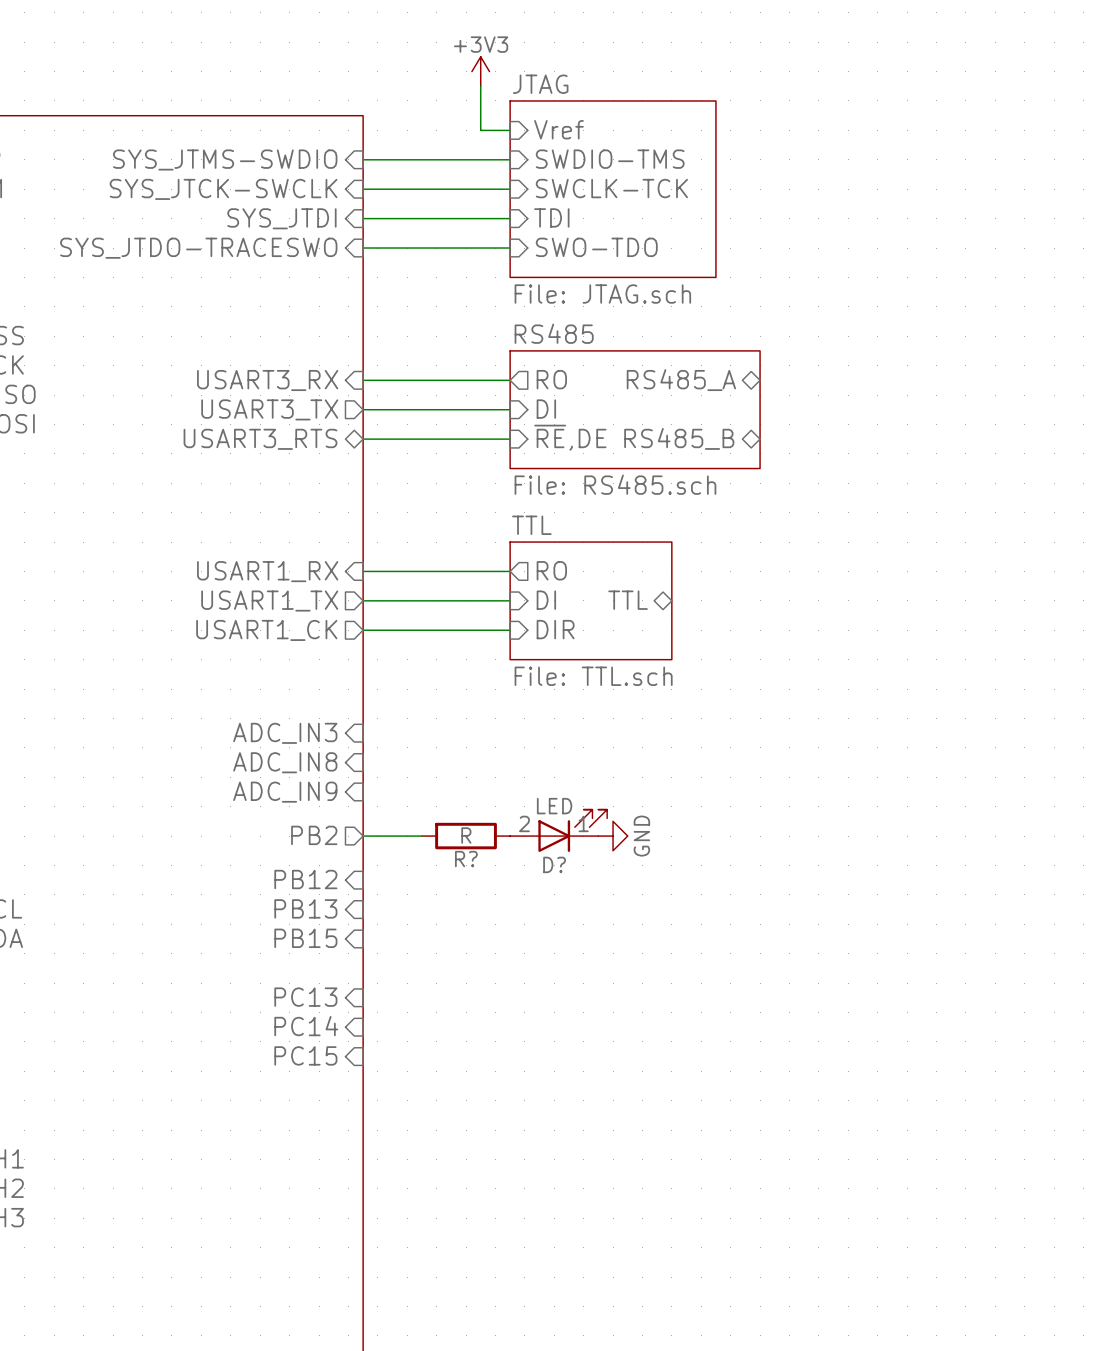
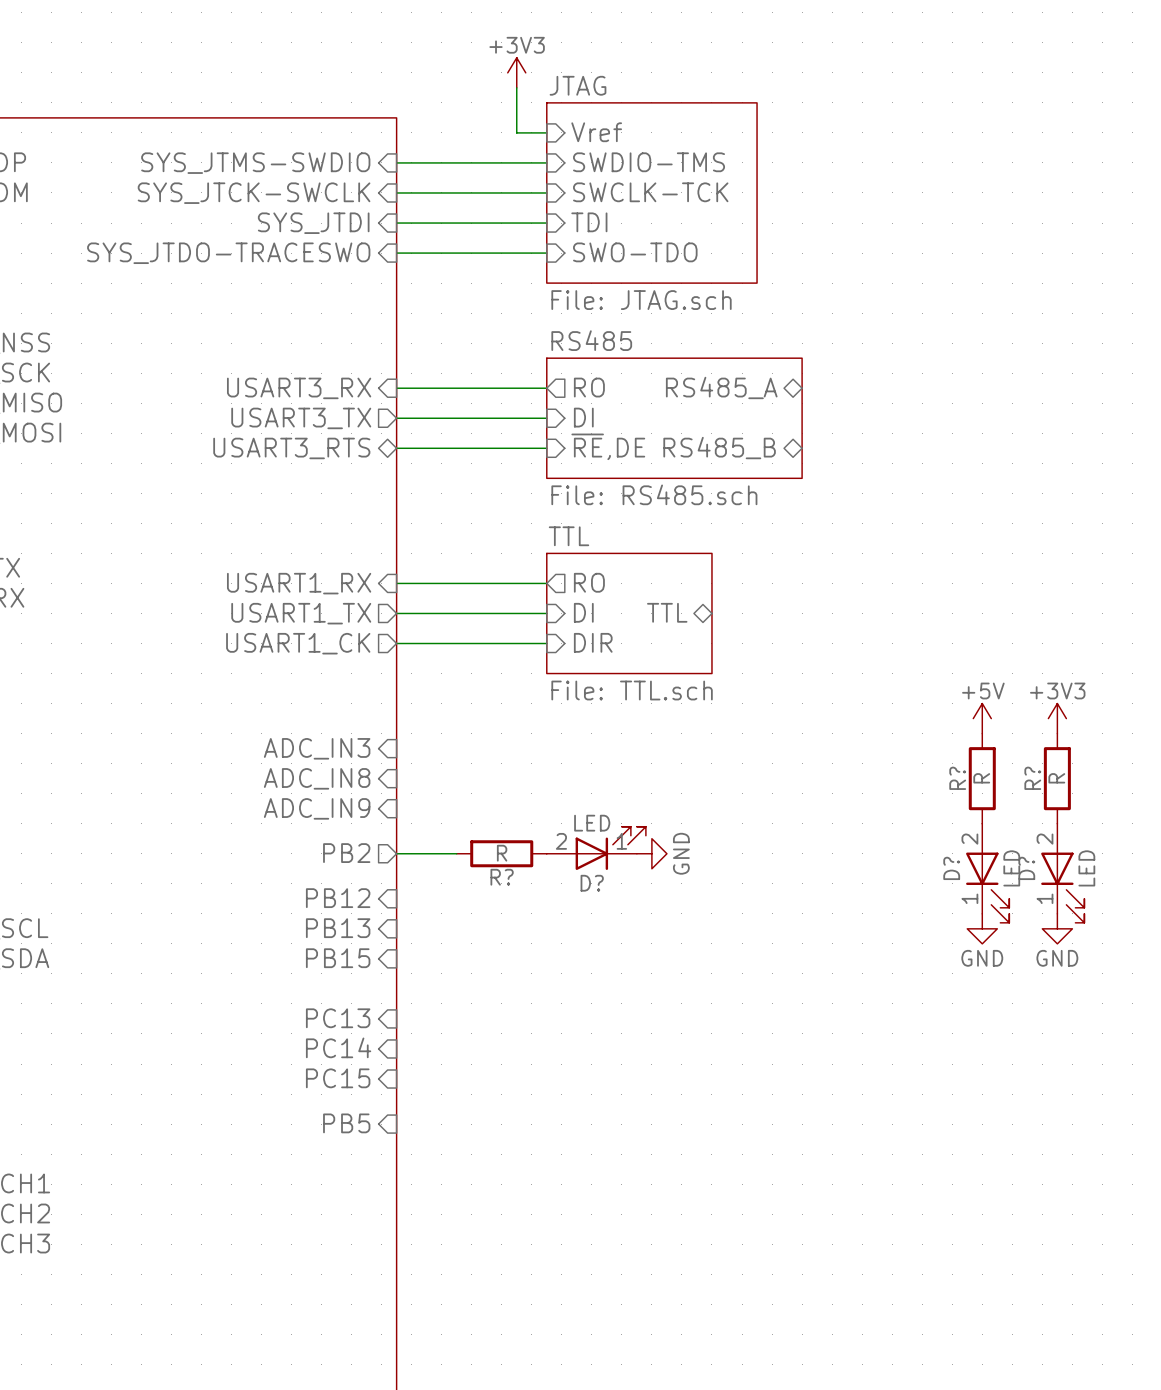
power symbol: none -> +5V (982, 718)
power symbol: none -> +3V3 (1057, 718)
R?: none -> R (982, 778)
R?: none -> R (1057, 778)
D?: none -> LED (987, 873)
D?: none -> LED (1062, 873)
power symbol: none -> GND (982, 928)
power symbol: none -> GND (1057, 928)
sheet pin: none -> PB5 (346, 1123)

